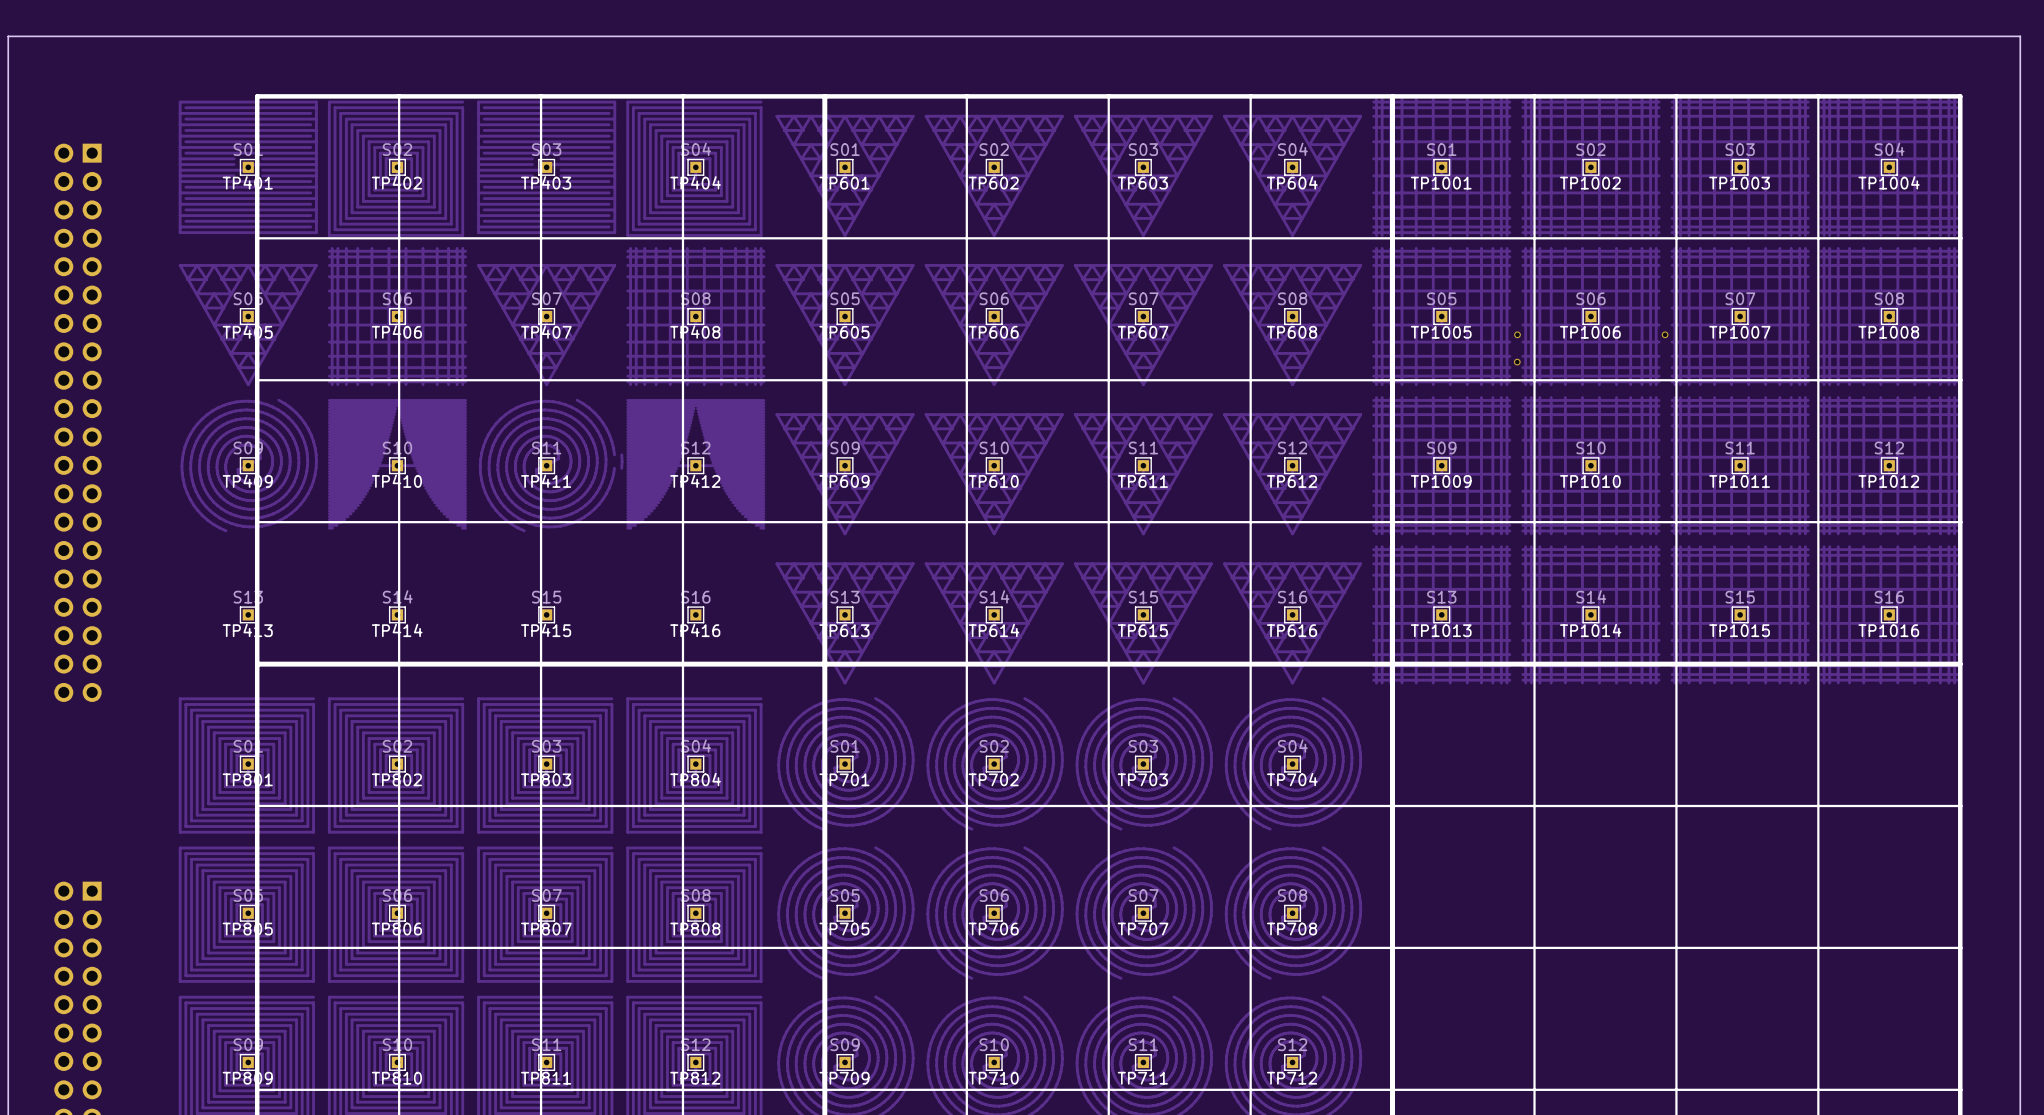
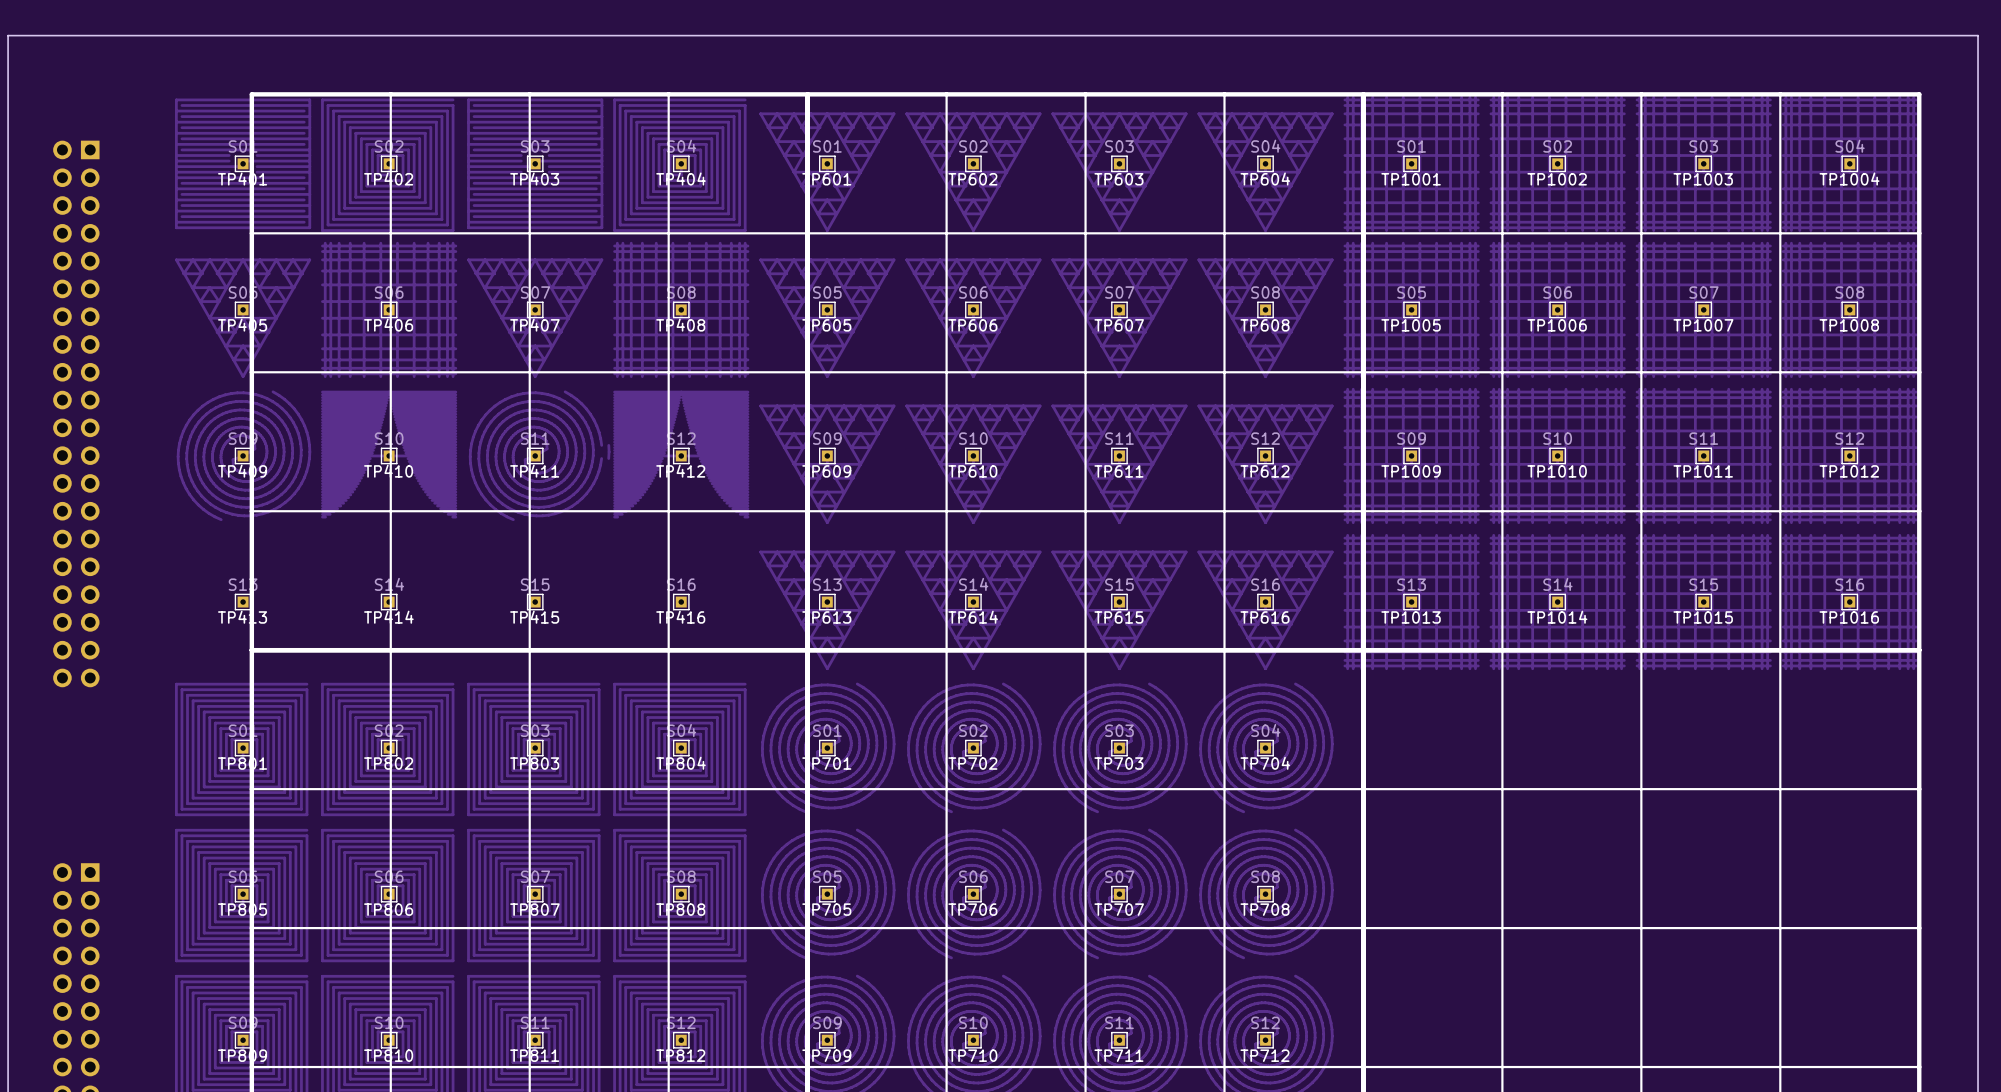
via: (1517, 334) -> none
via: (1665, 334) -> none
via: (1517, 362) -> none

